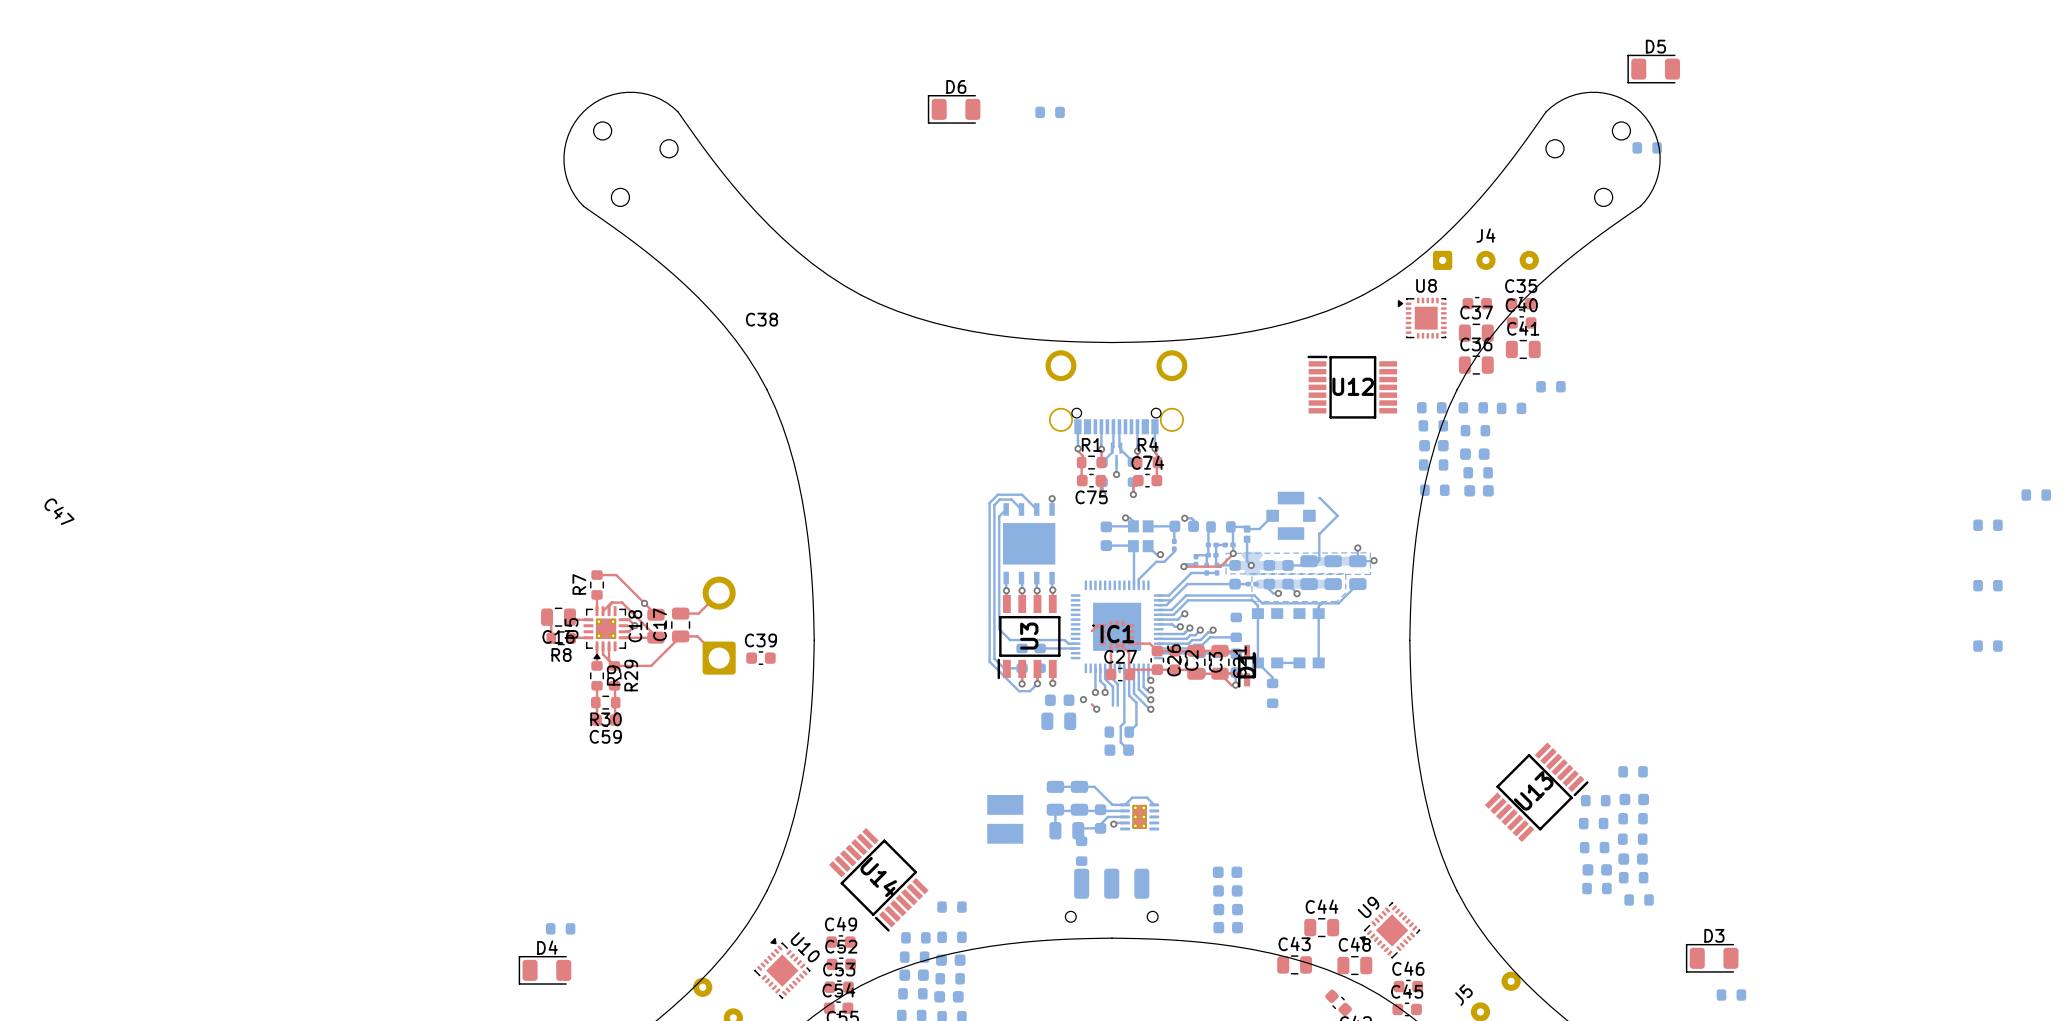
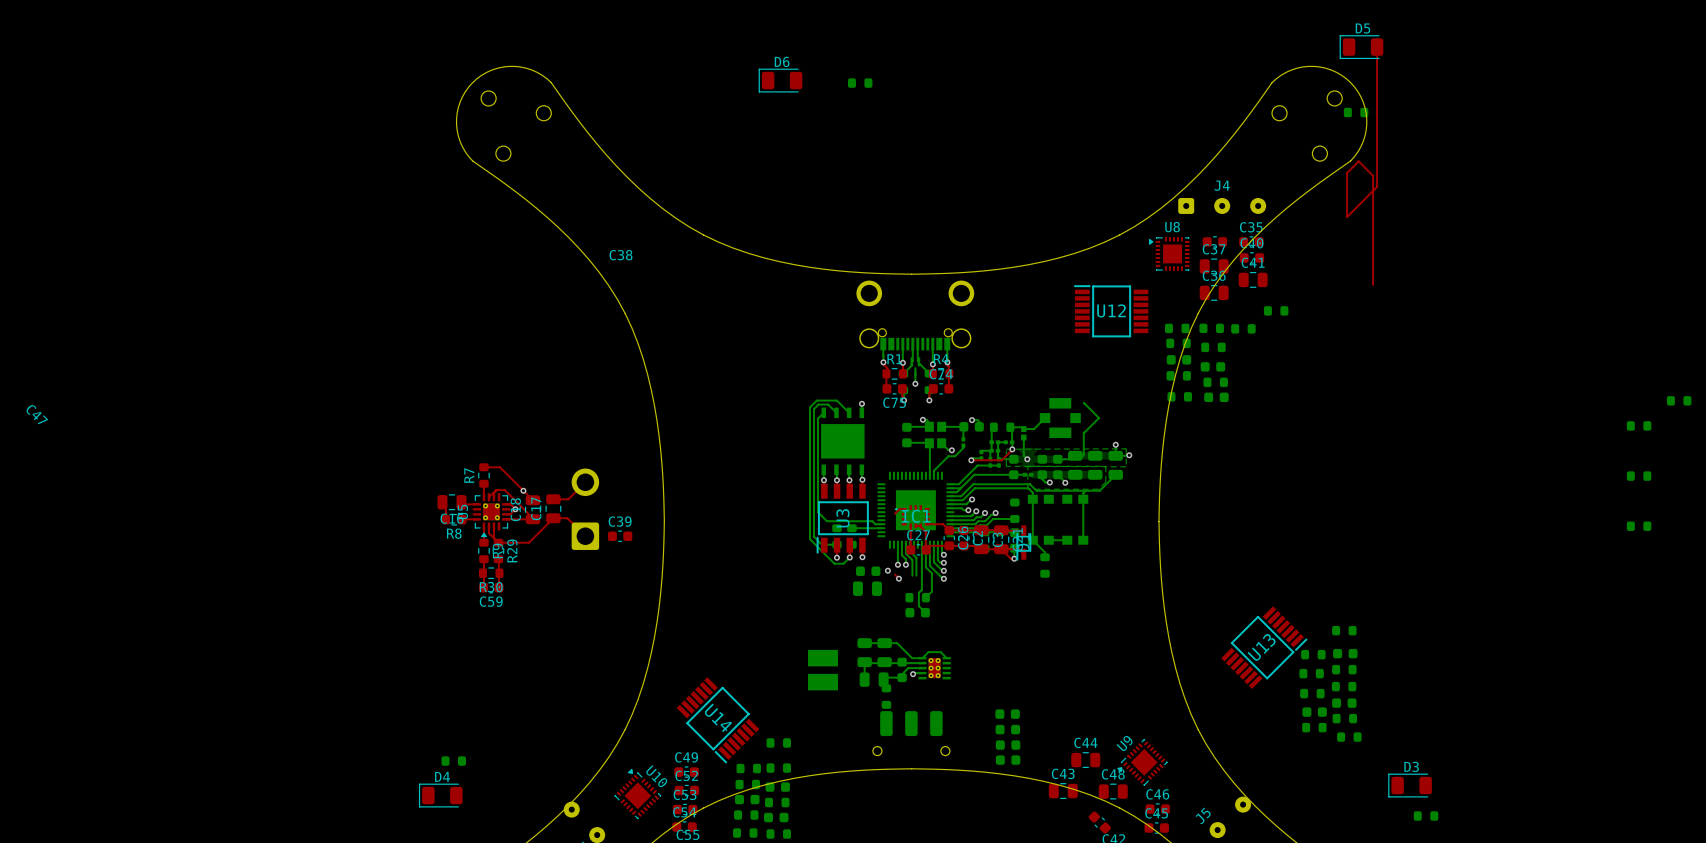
top track: none -> (1377, 47) (1377, 186) (1347, 216) (1347, 172) (1353, 166)
top track: none -> (1353, 166) (1358, 161) (1373, 175) (1373, 284)

